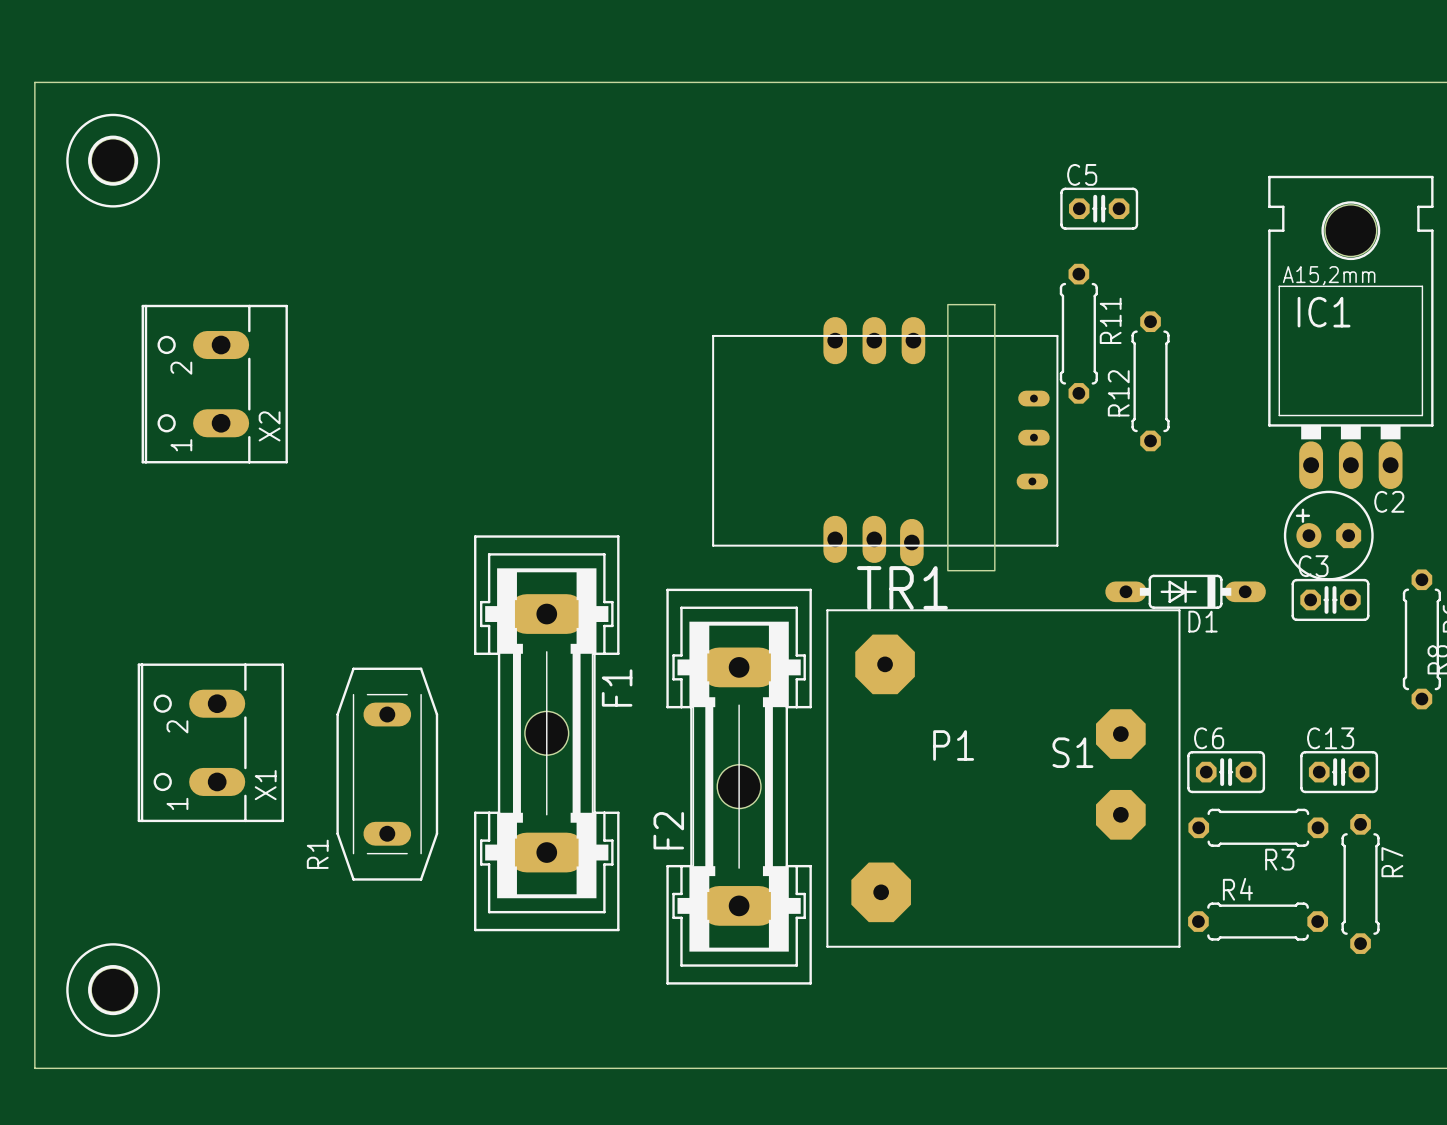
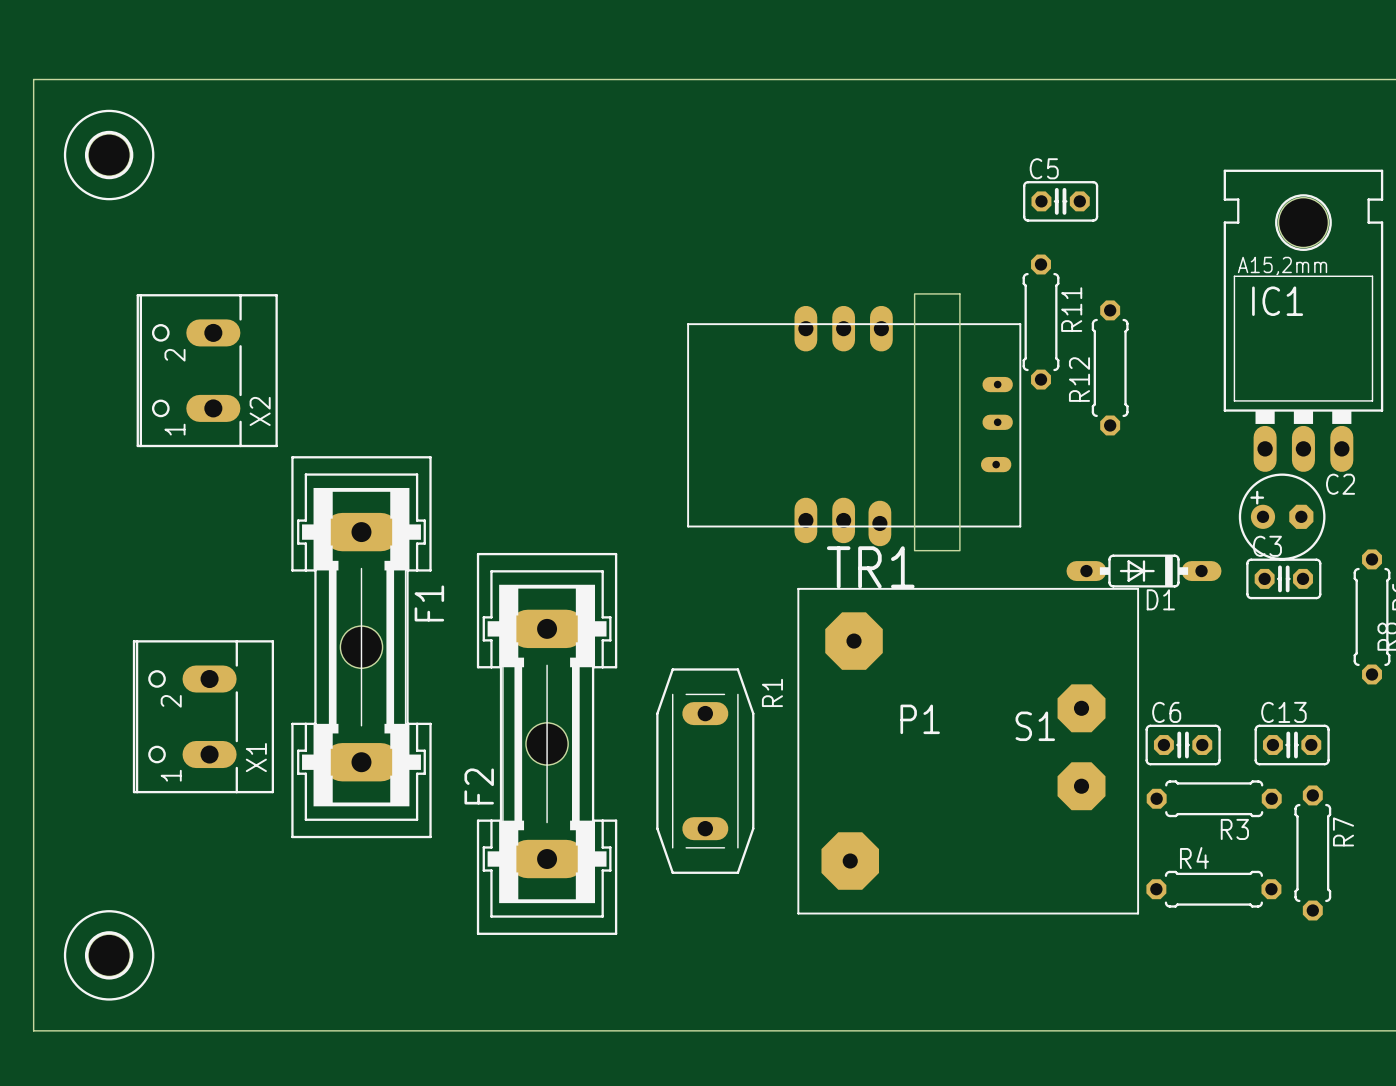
F1 position: (546, 733) -> (361, 647)
R1 position: (387, 774) -> (705, 771)
F2 position: (739, 786) -> (547, 743)
R1 name position: R1 (317, 854) -> R1 (772, 692)

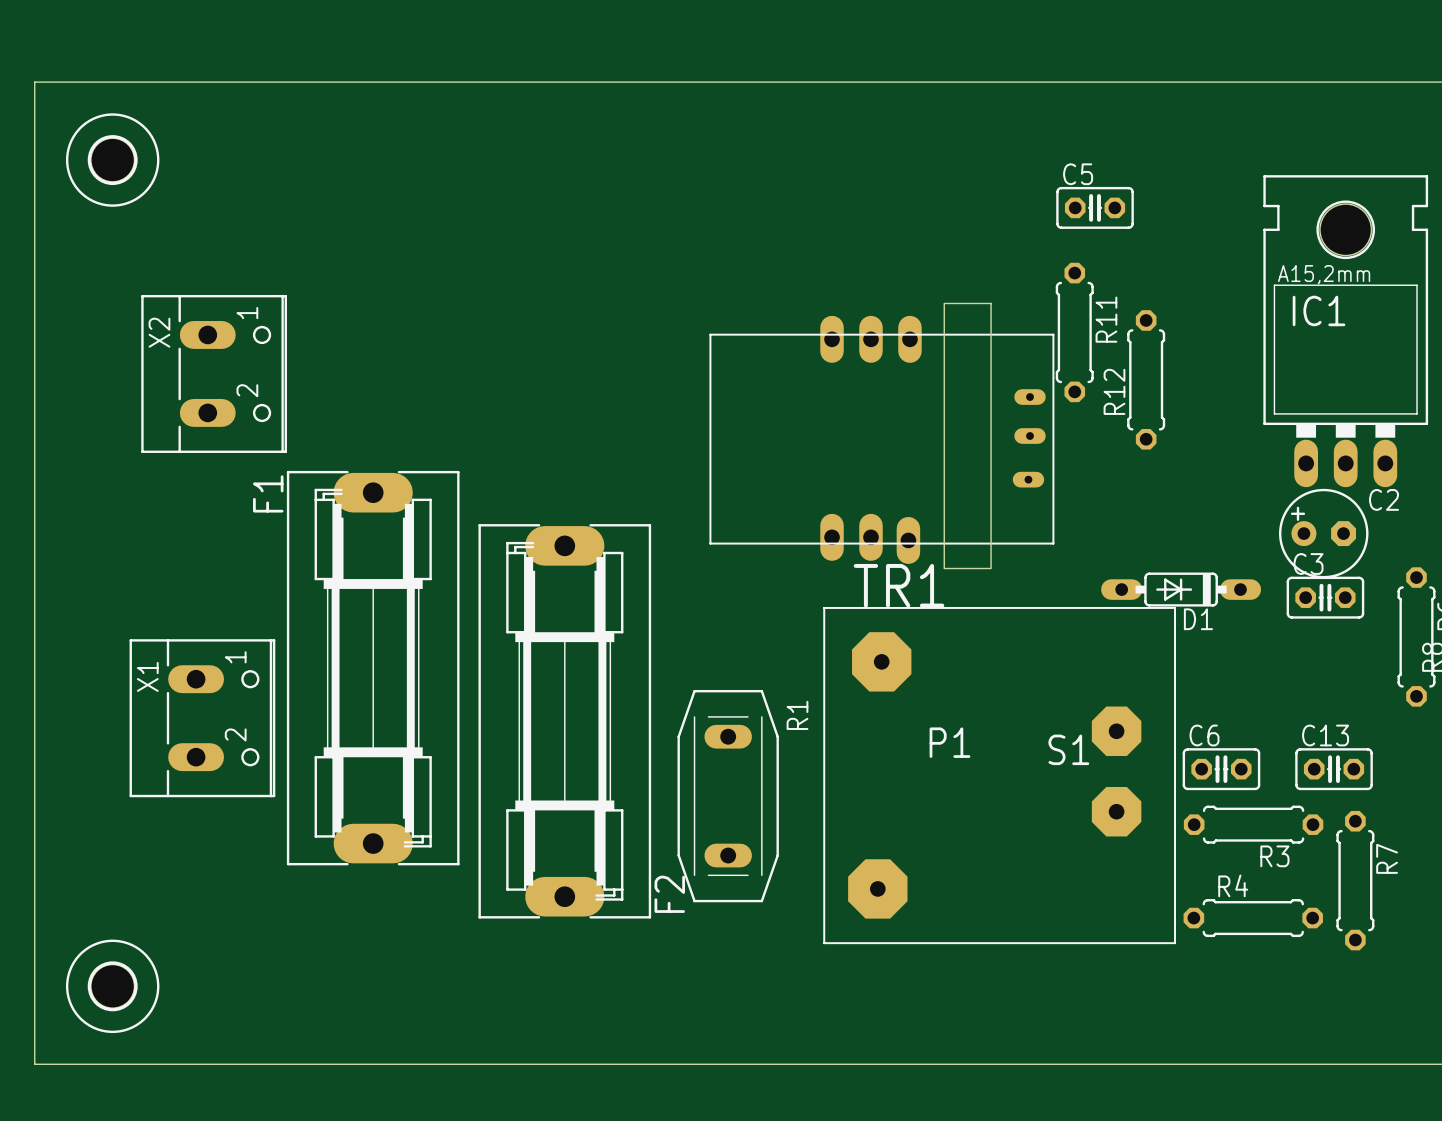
X2 footprint: [136, 294, 278, 448] -> [141, 294, 287, 453]
X2 name position: X2 (260, 411) -> X2 (159, 332)
F1 footprint: [291, 456, 432, 839] -> [286, 470, 460, 866]
F2 footprint: [476, 552, 618, 935] -> [478, 524, 652, 919]
F1 name position: F1 (429, 603) -> F1 (268, 493)
X1 footprint: [132, 640, 275, 794] -> [129, 639, 276, 798]
X1 name position: X1 (256, 757) -> X1 (147, 676)
F2 name position: F2 (479, 786) -> F2 (669, 894)

